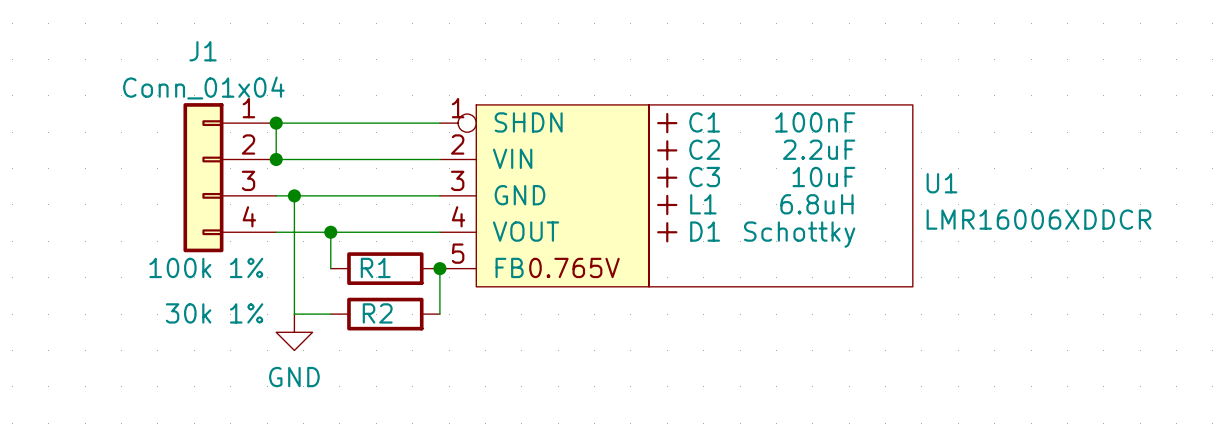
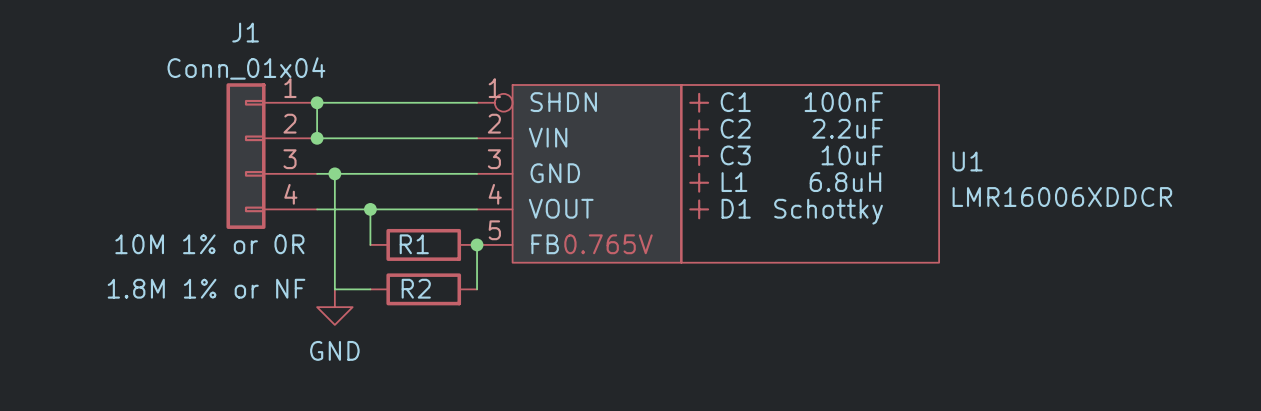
R1 value: 100k 1% (206, 267) -> 10M 1% or 0R (209, 244)
R2 value: 30k 1% (214, 313) -> 1.8M 1% or NF (206, 288)

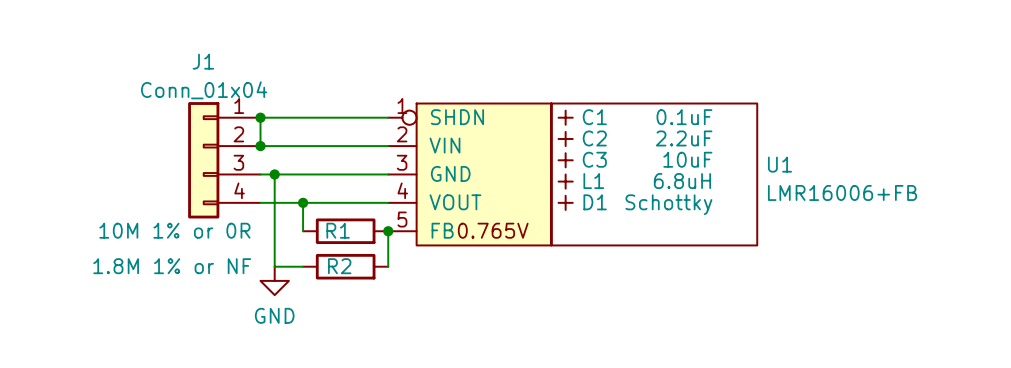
C1 value: 100nF (843, 102) -> 0.1uF (684, 117)
U1 value: LMR16006XDDCR (1062, 197) -> LMR16006+FB (842, 192)

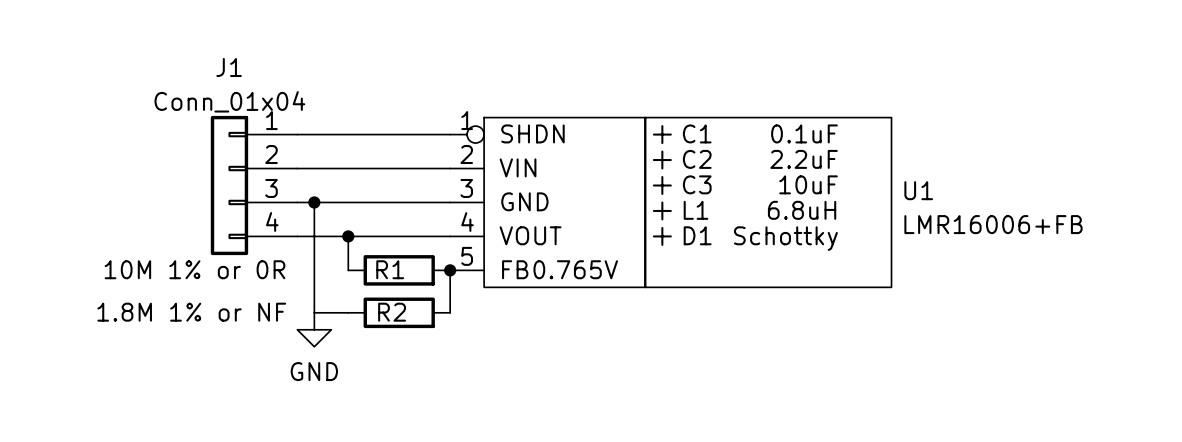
wire: (260, 117) (260, 146) -> none
junction: (260, 117) -> none
junction: (260, 146) -> none

